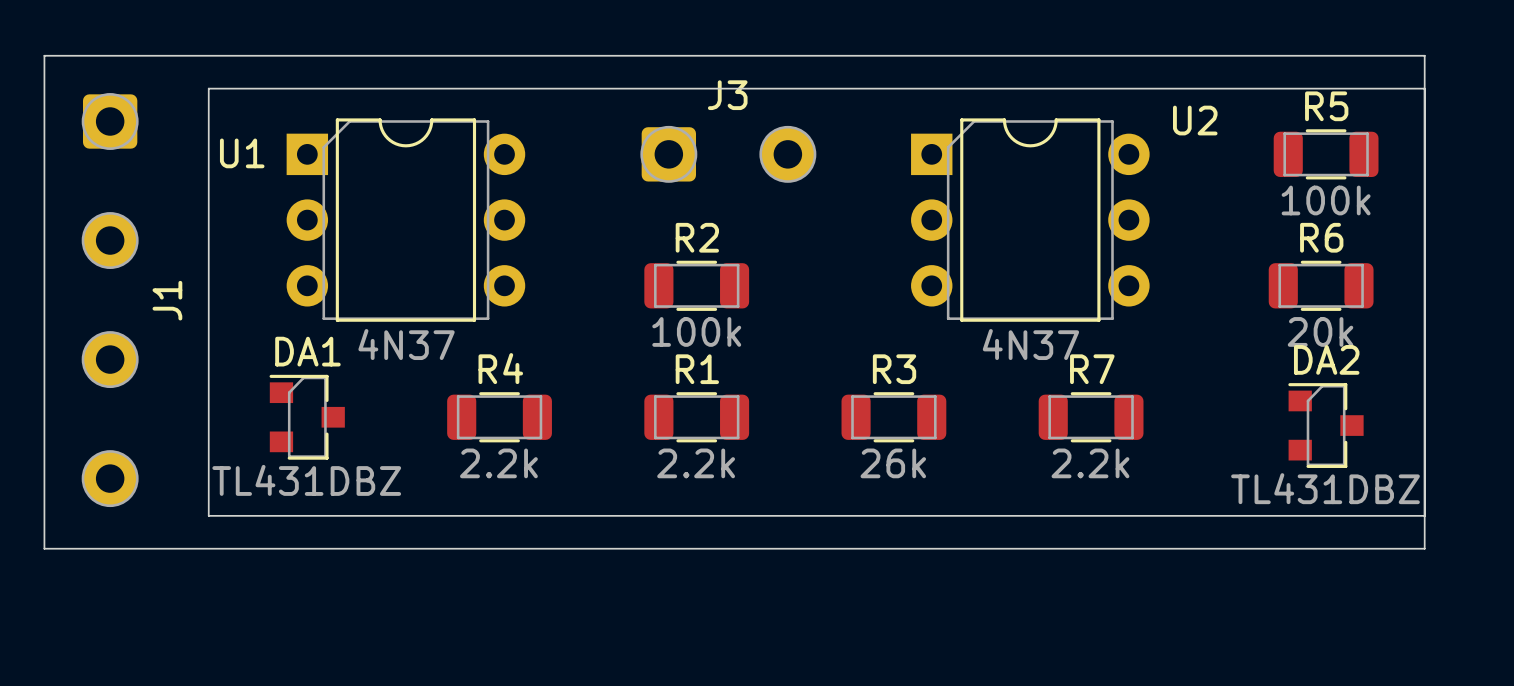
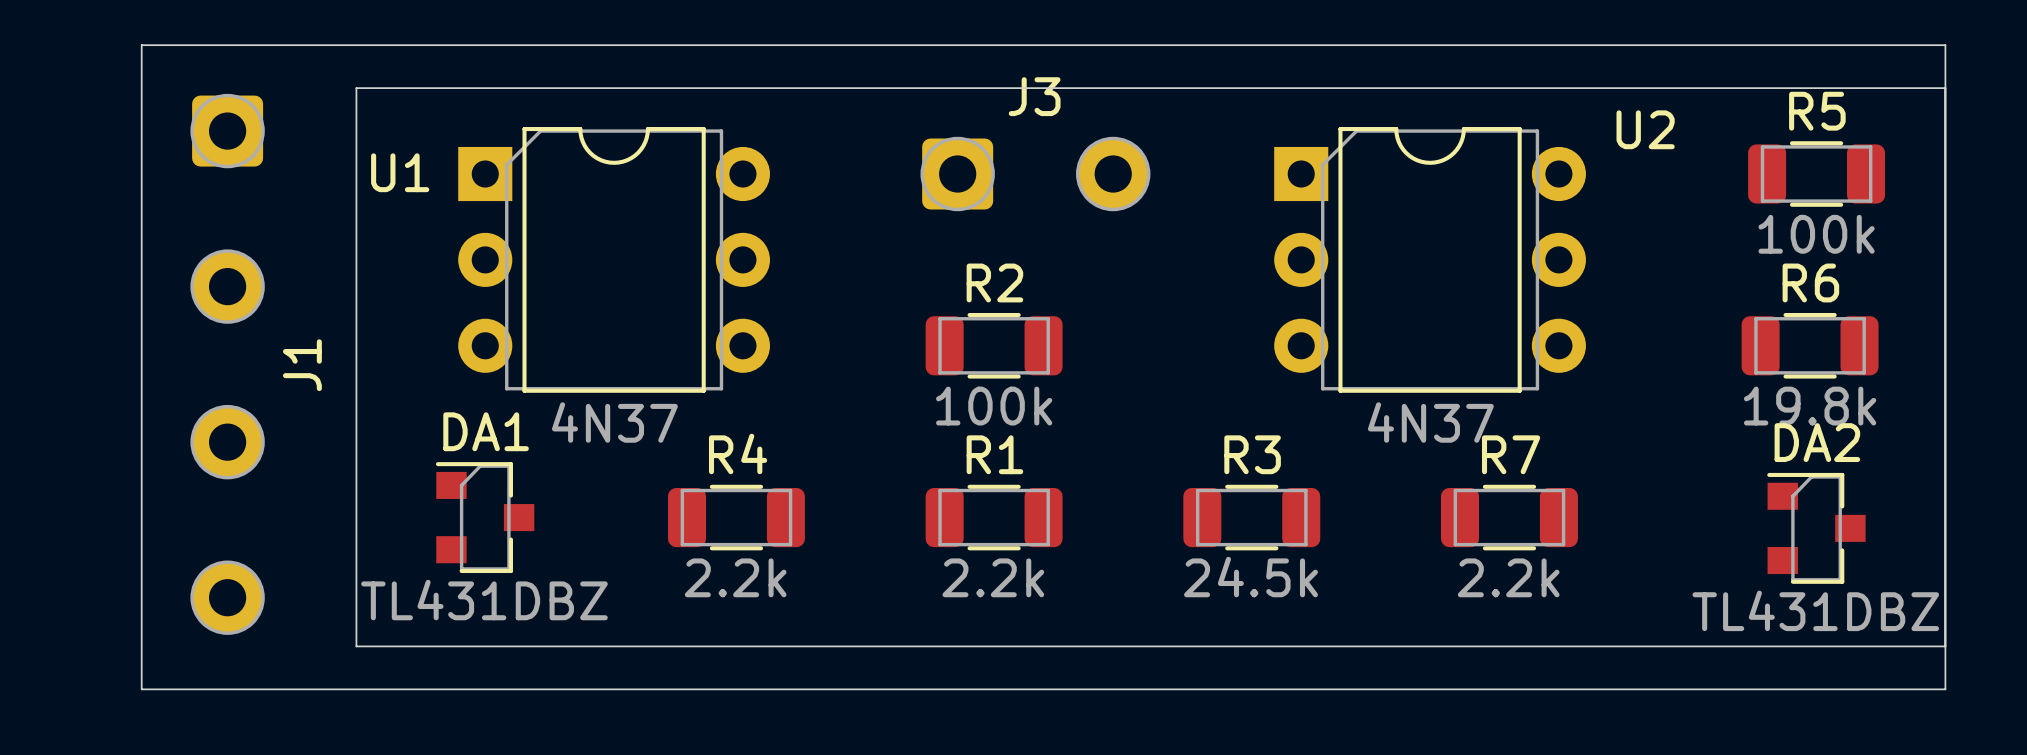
R6 value: 20k (1320, 331) -> 19.8k (1810, 406)
R3 value: 26k (893, 463) -> 24.5k (1250, 577)

